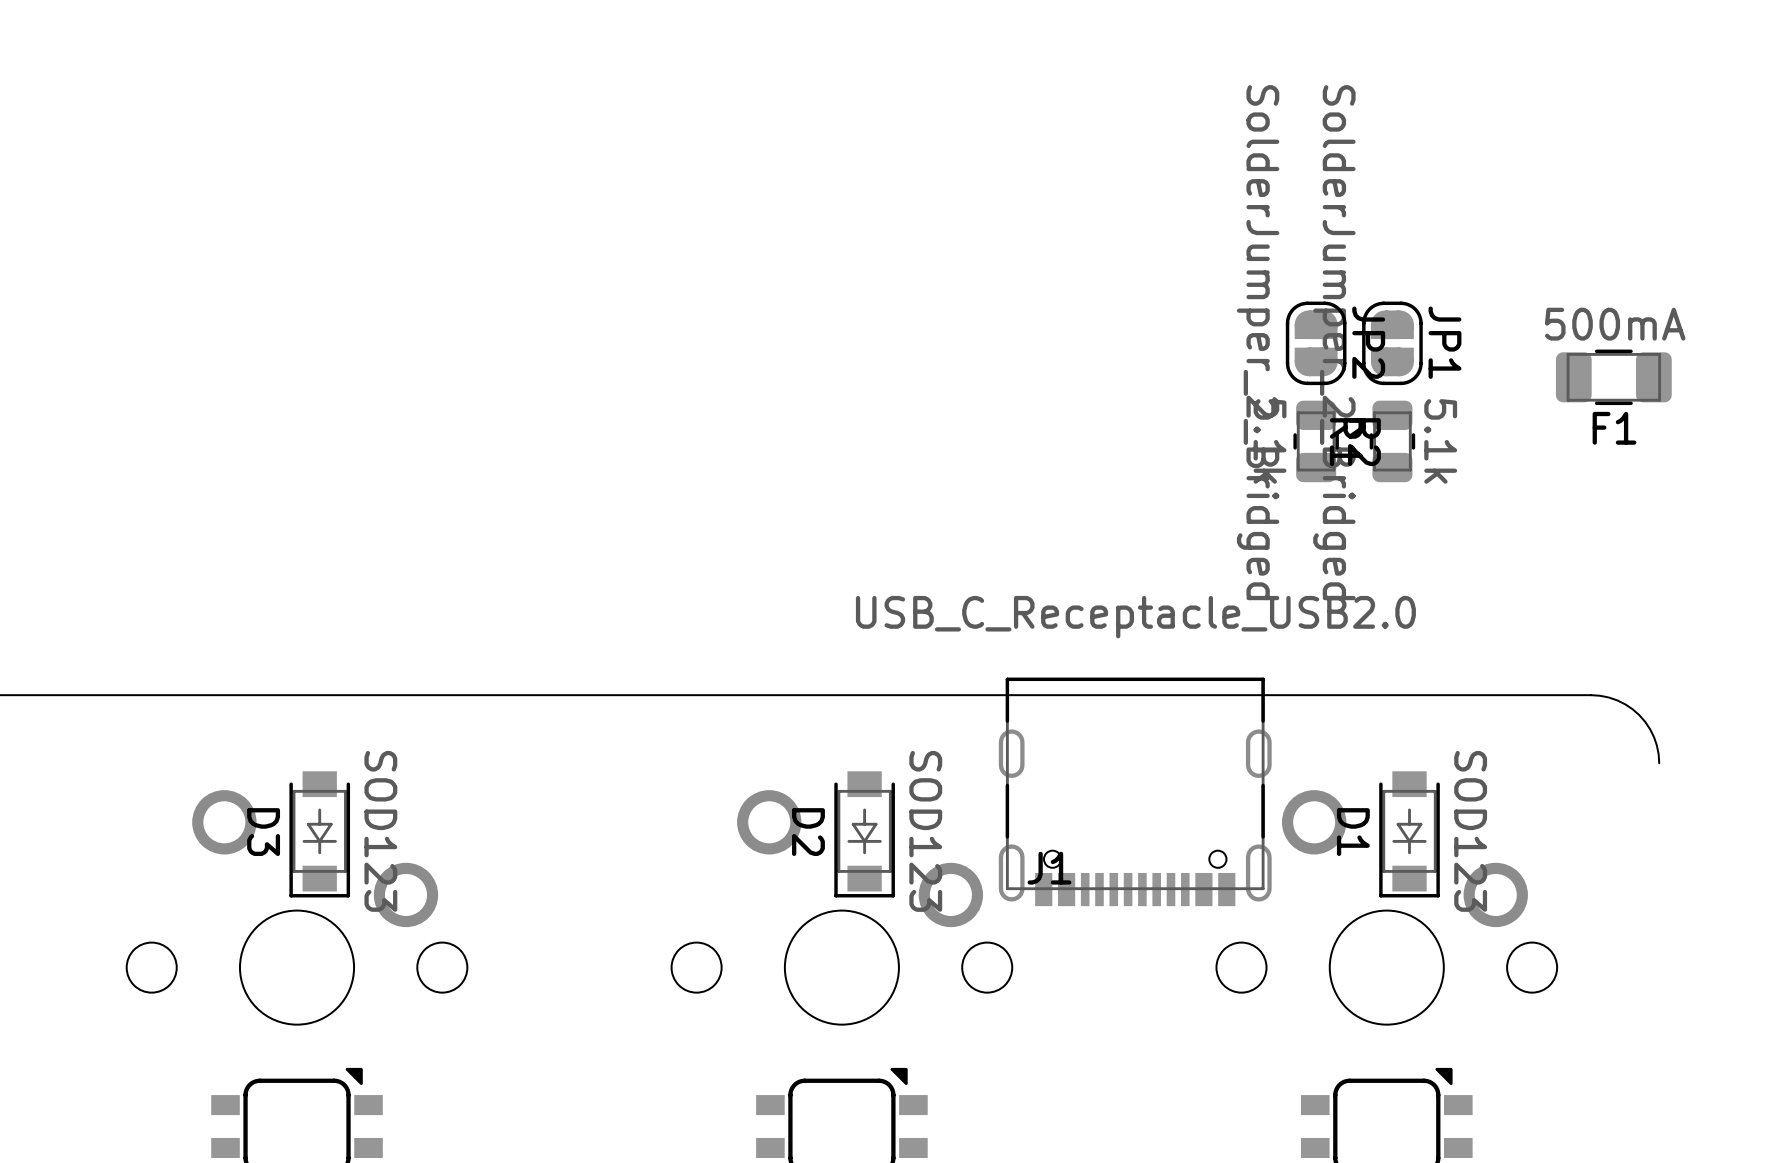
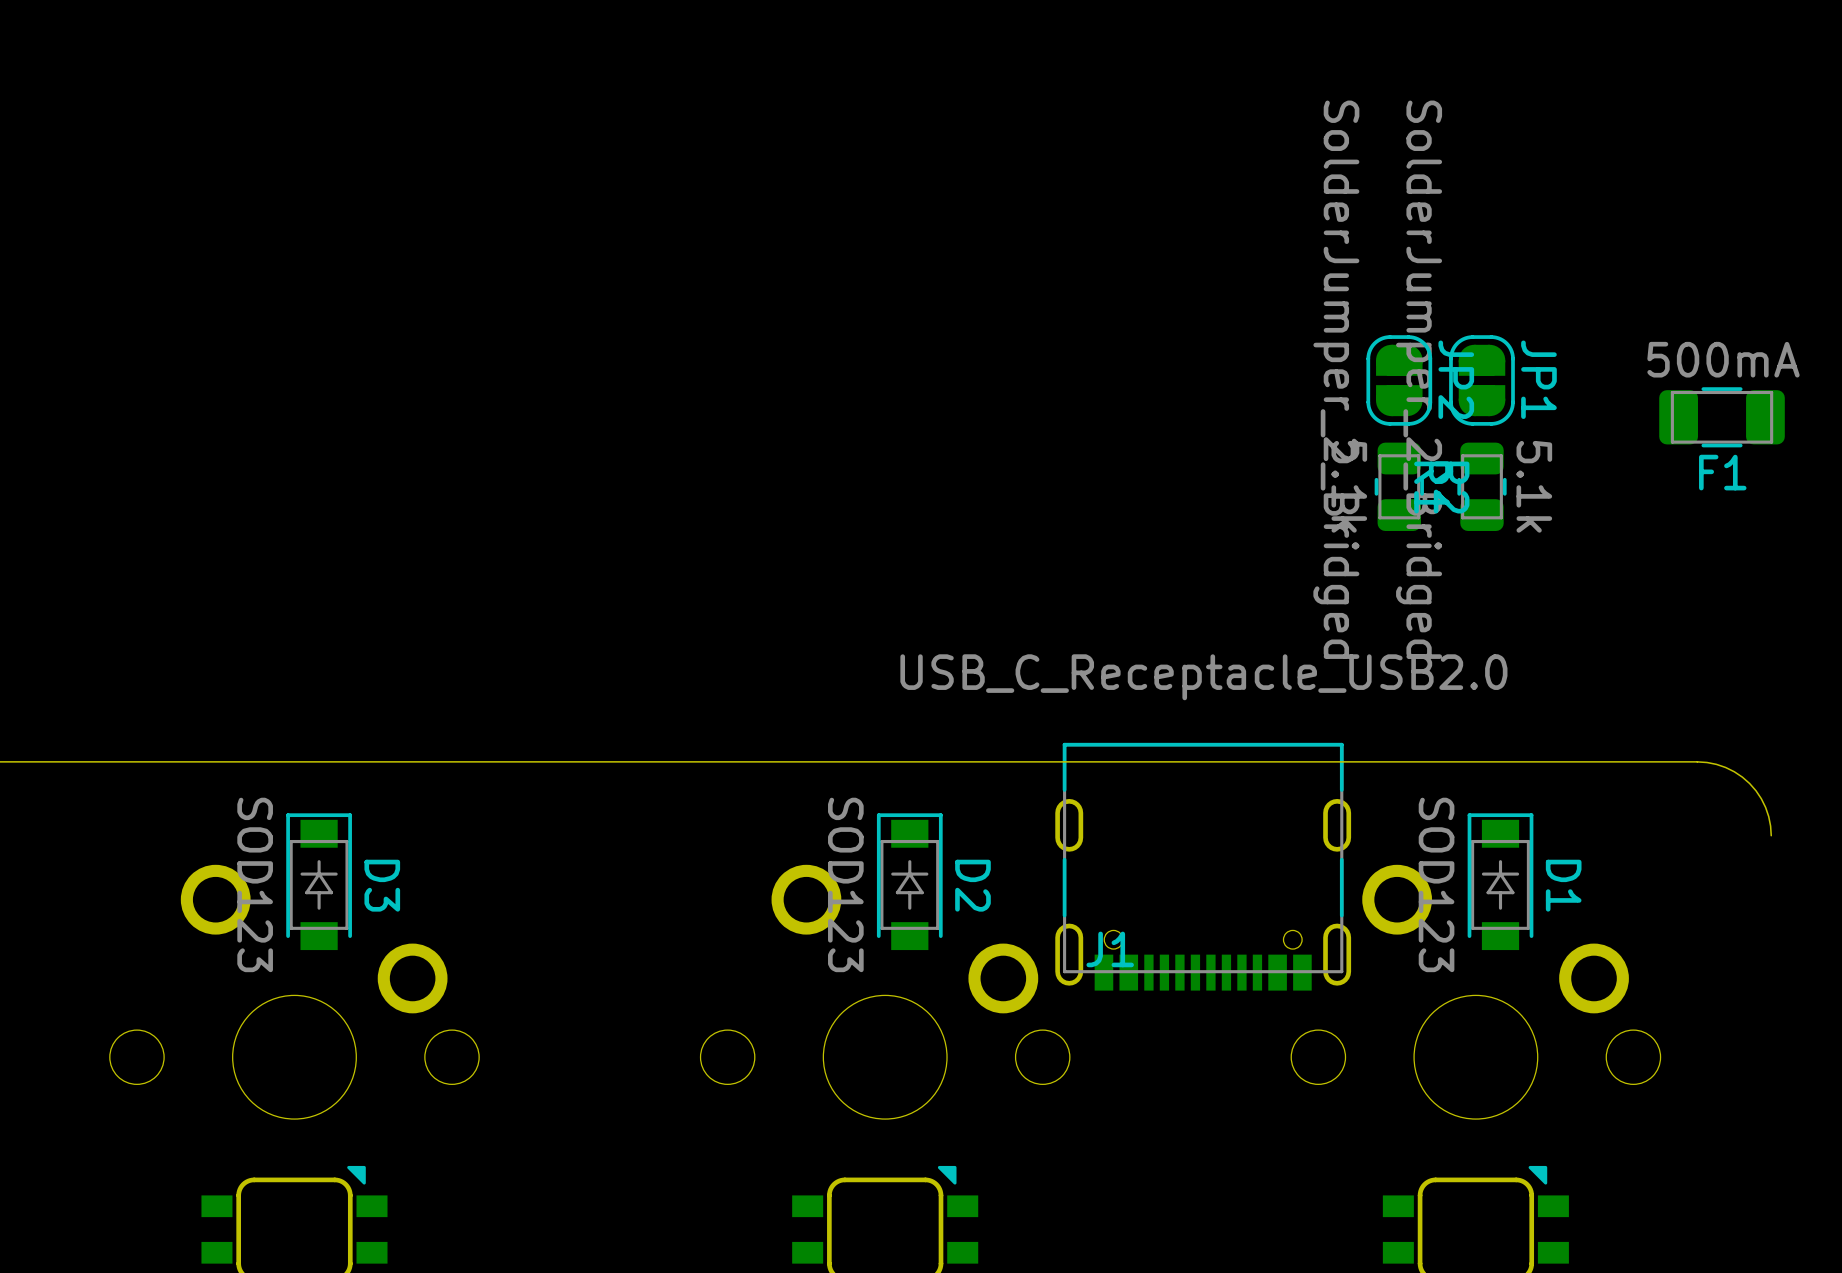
D3 rotation: 0° (319, 834) -> 180° (319, 881)
D2 rotation: 0° (864, 834) -> 180° (909, 881)
D1 rotation: 0° (1409, 834) -> 180° (1500, 881)

